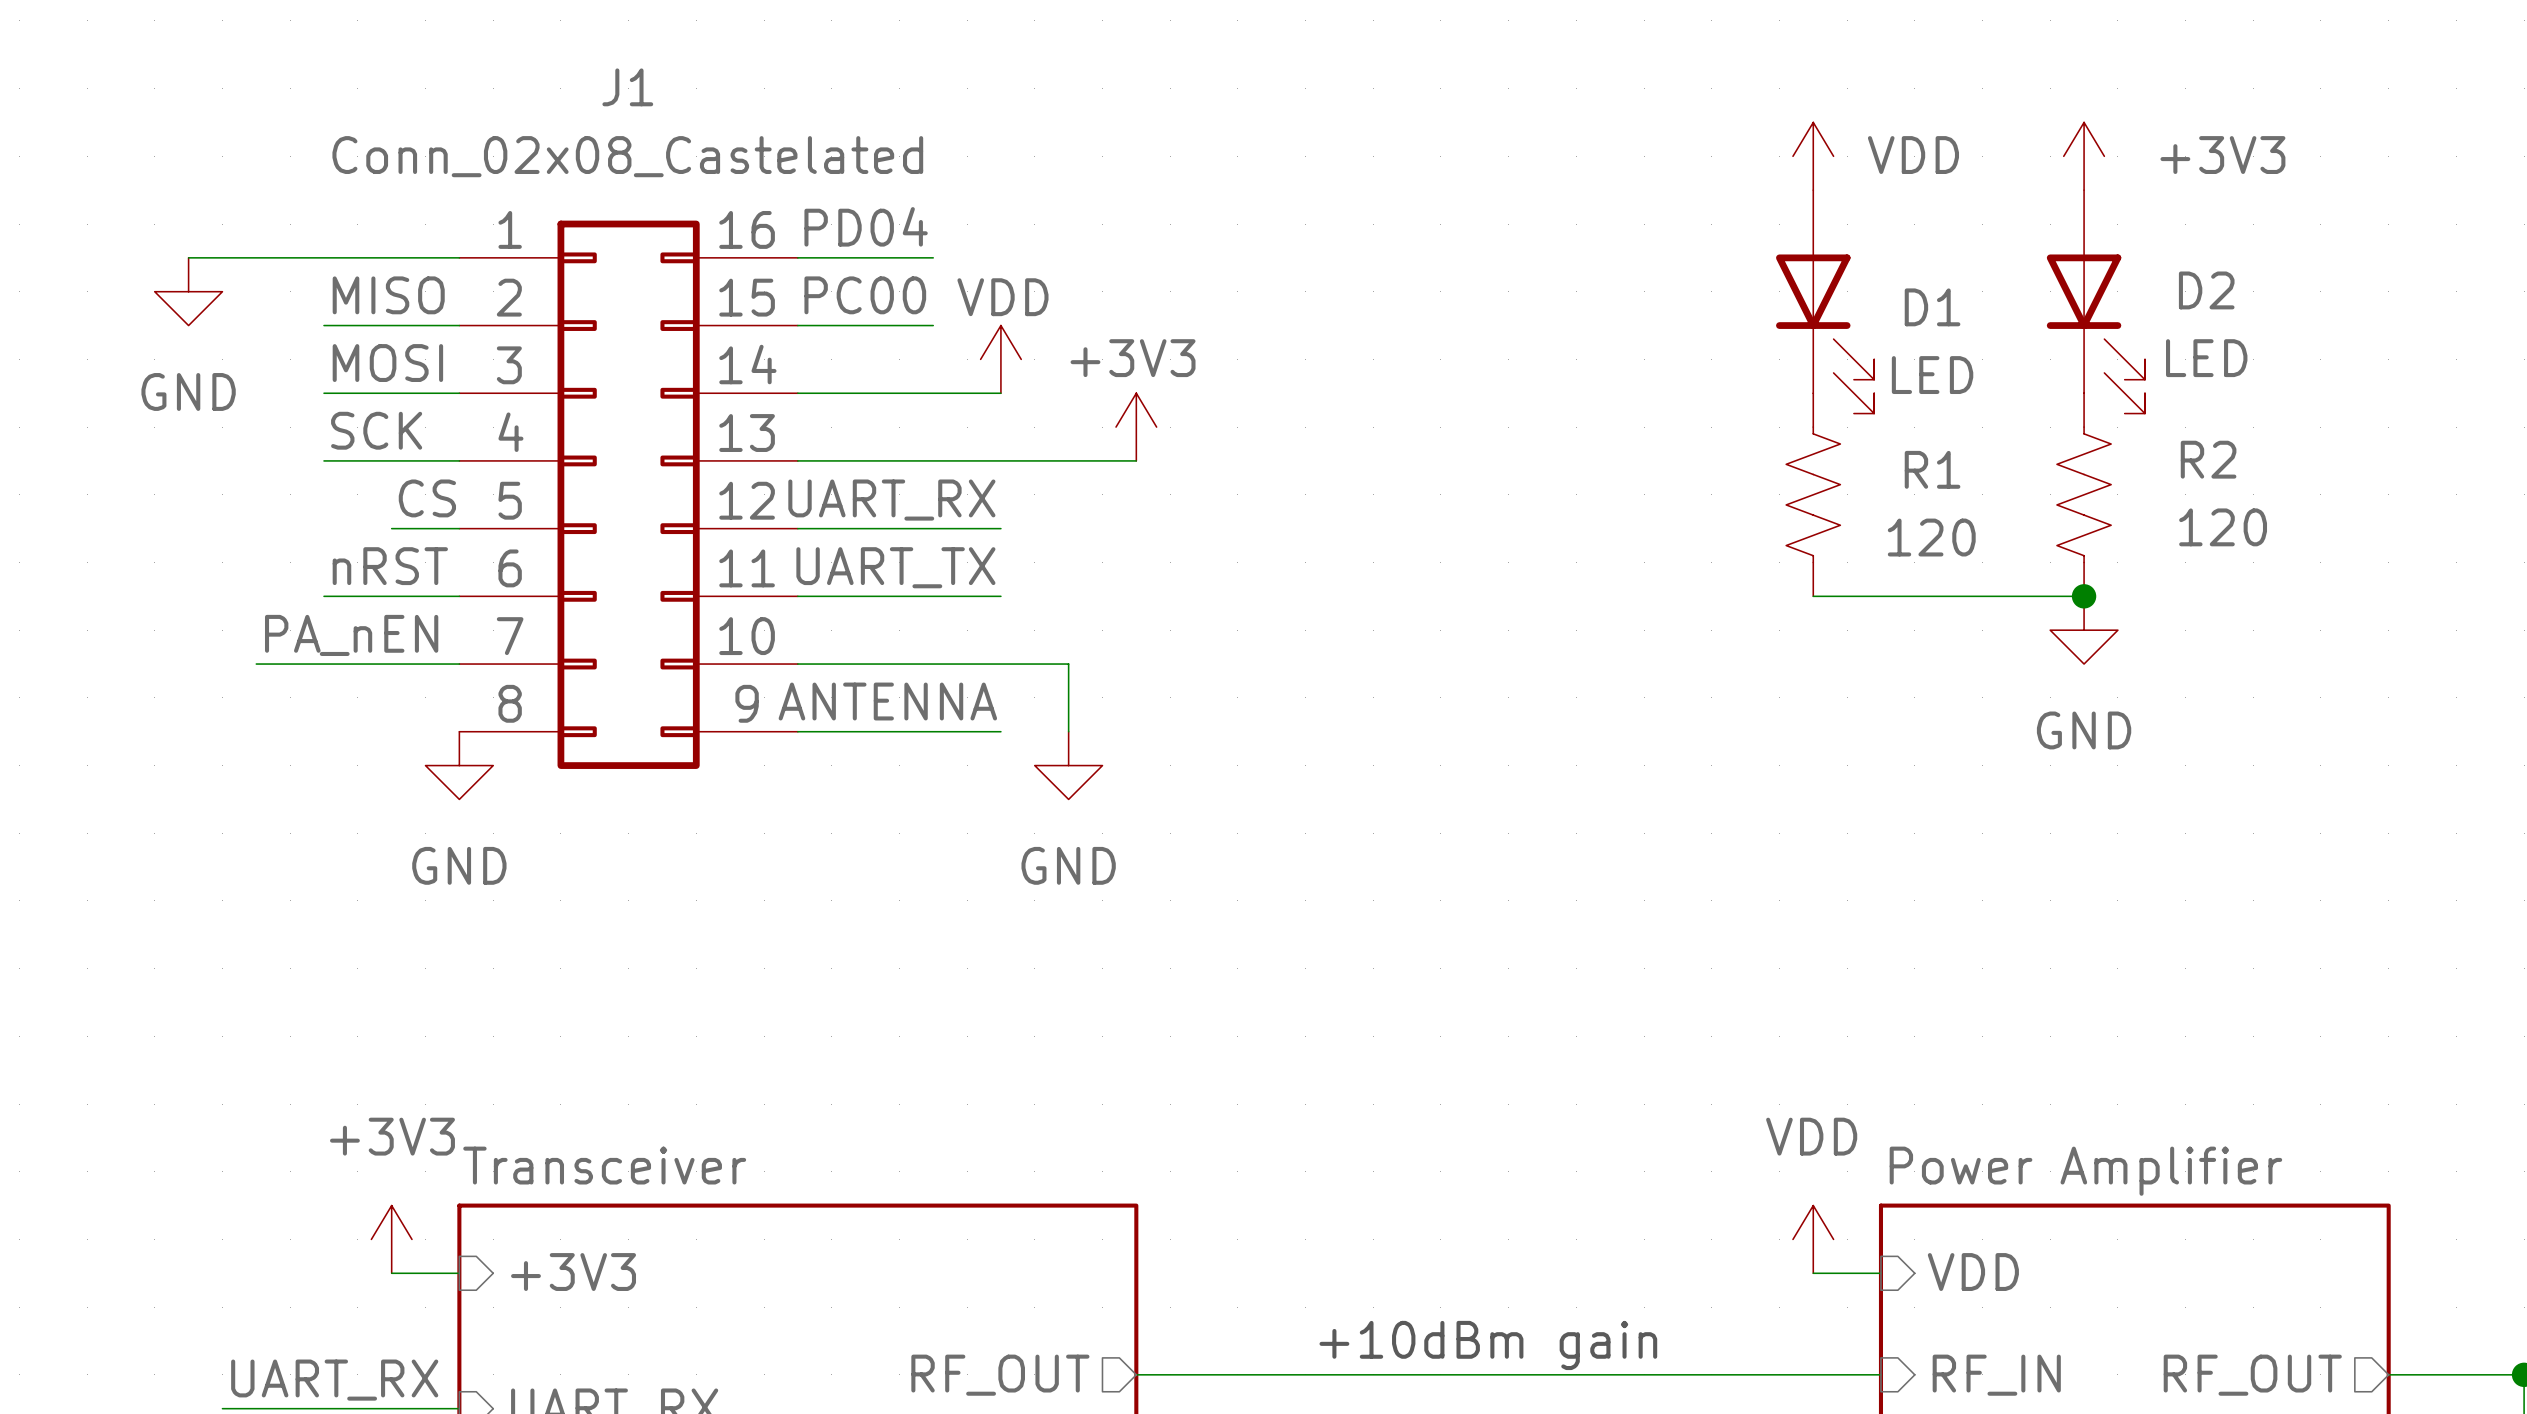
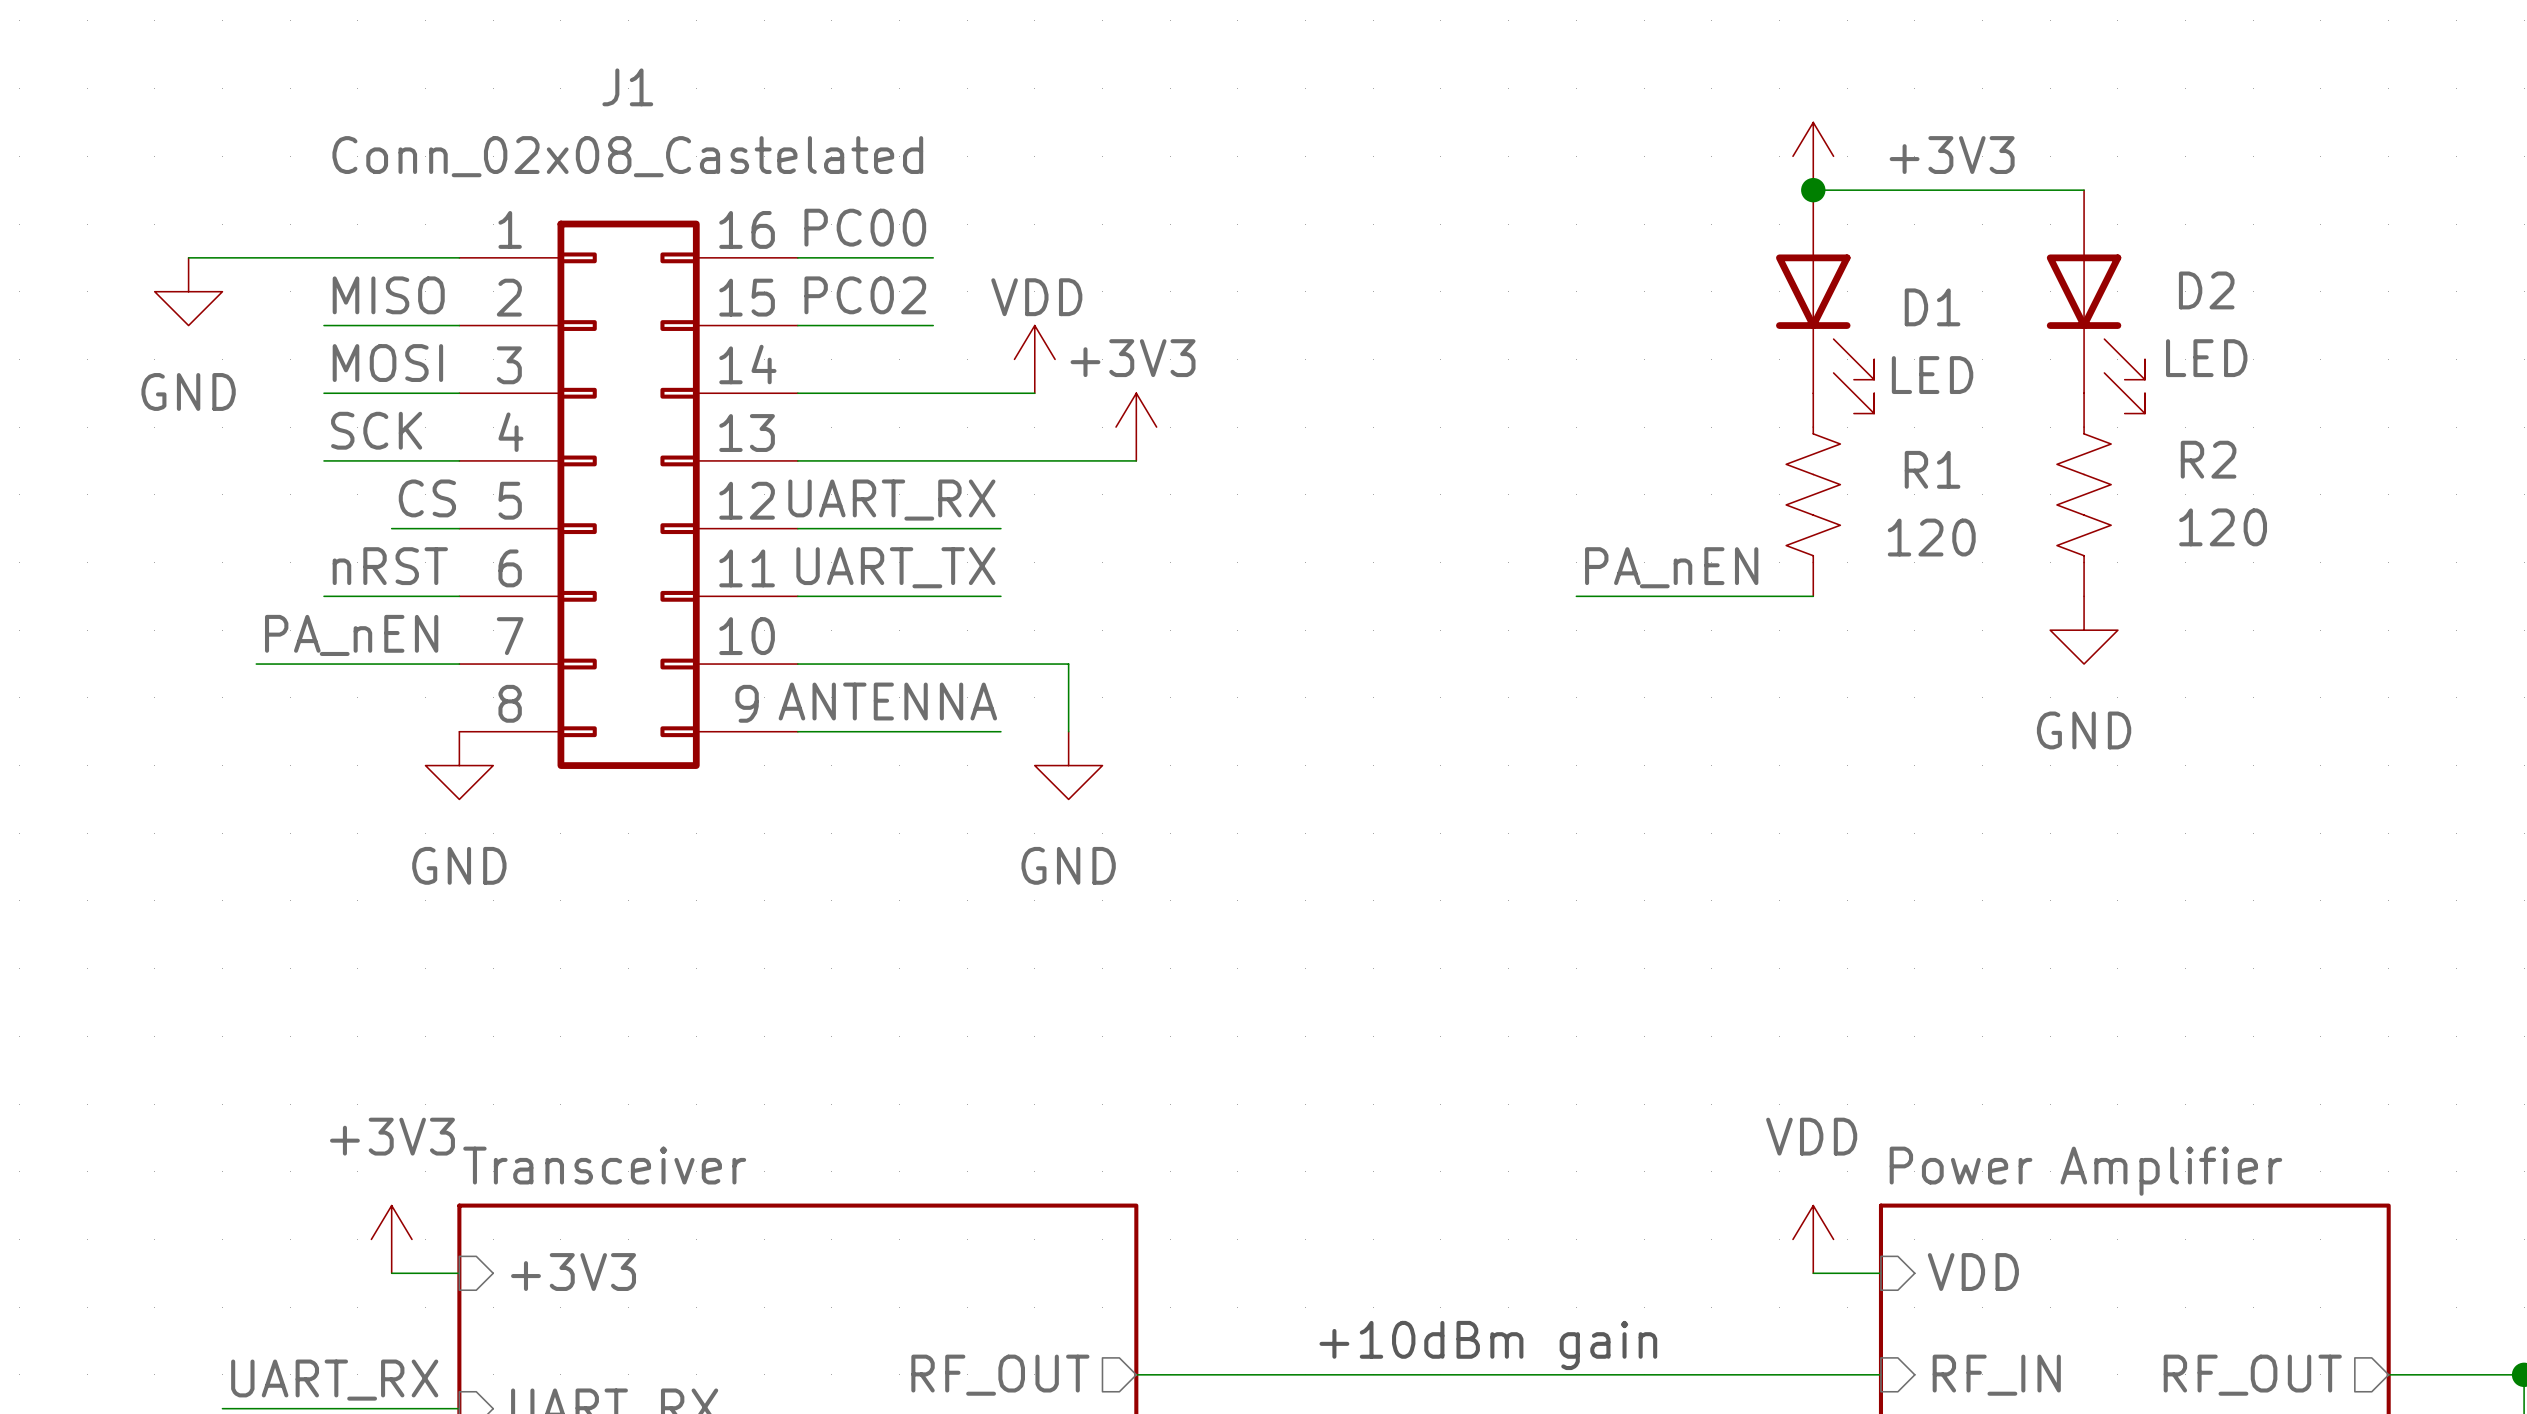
power symbol: VDD (1813, 156) -> +3V3 (1813, 156)
power symbol: +3V3 (2084, 156) -> none
wire: none -> (1813, 190) (2084, 190)
junction: none -> (1813, 190)
label: PD04 (866, 226) -> PC00 (865, 227)
label: PC00 (865, 295) -> PC02 (865, 295)
power symbol position: VDD (1000, 359) -> VDD (1034, 359)
wire: none -> (1000, 393) (1034, 393)
label: none -> PA_nEN (1671, 567)
wire: (1813, 596) (2084, 596) -> (1813, 596) (1576, 596)
junction: (2084, 596) -> none

